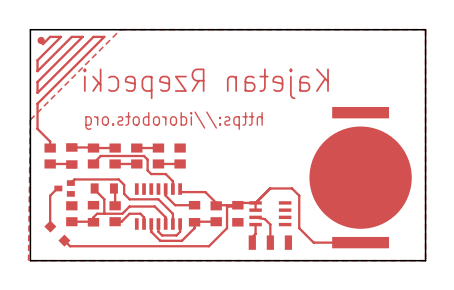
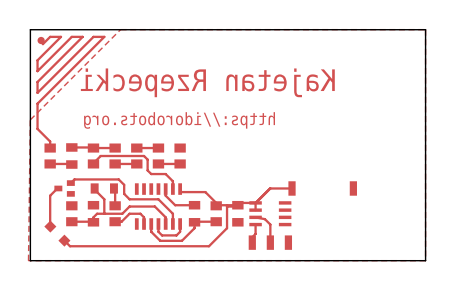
part: (360, 177) -> none
top track: (292, 188) (299, 195) (299, 228) (313, 242) (360, 242) -> none
part: none -> (292, 188)
part: none -> (353, 188)

